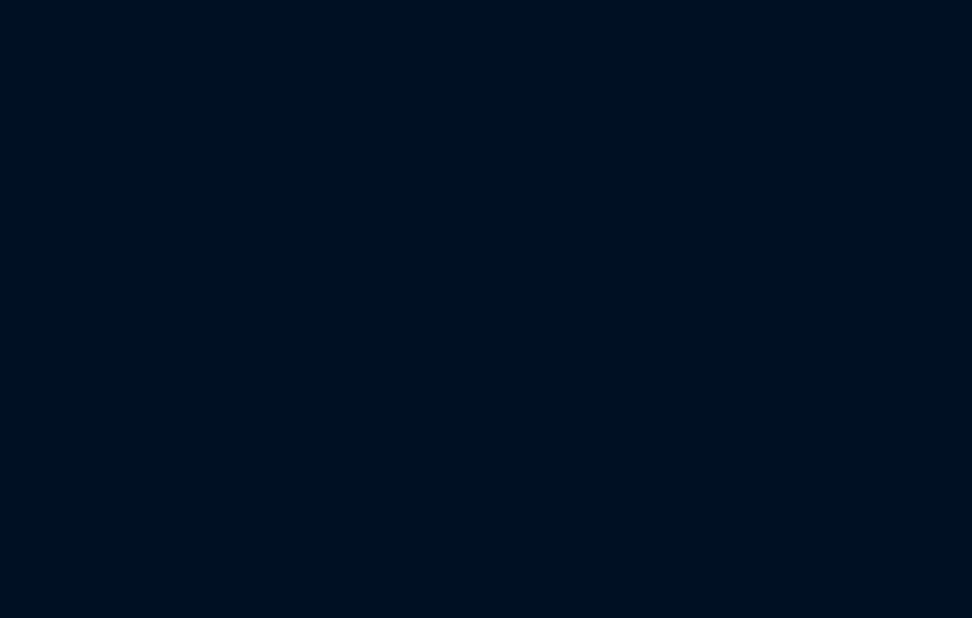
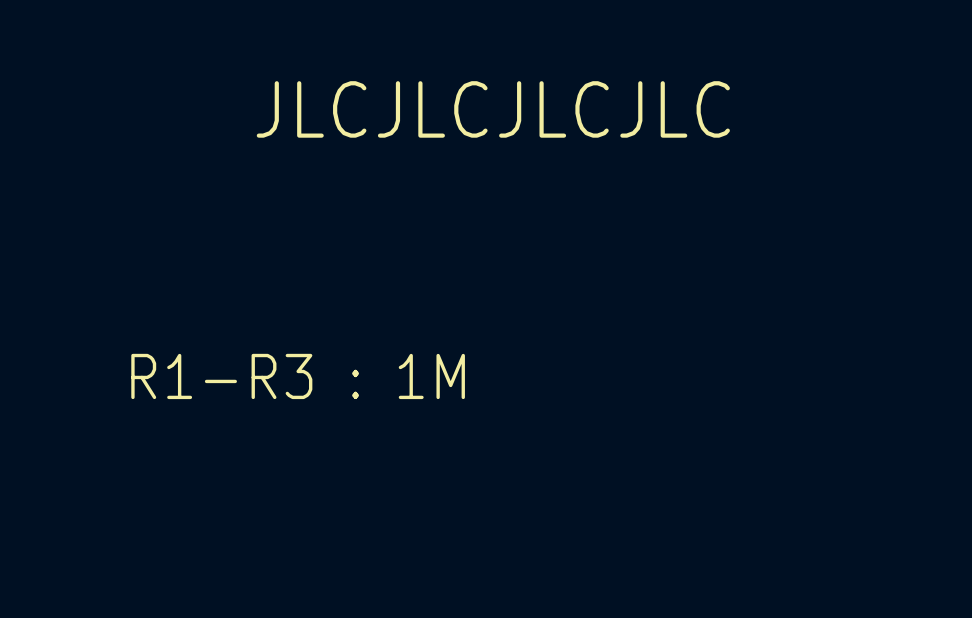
text: none -> JLCJLCJLCJLC (493, 109)
text: none -> R1-R3 : 1M (298, 376)

